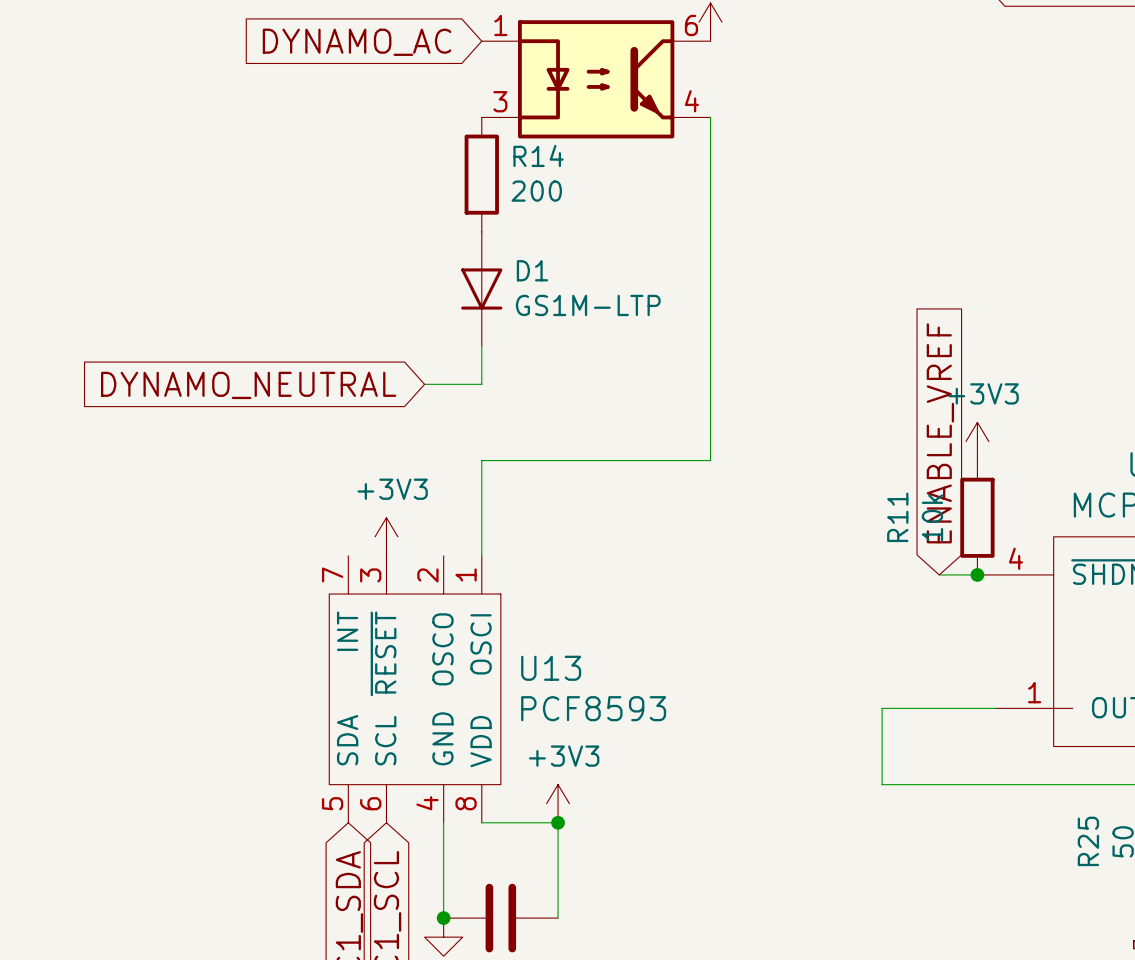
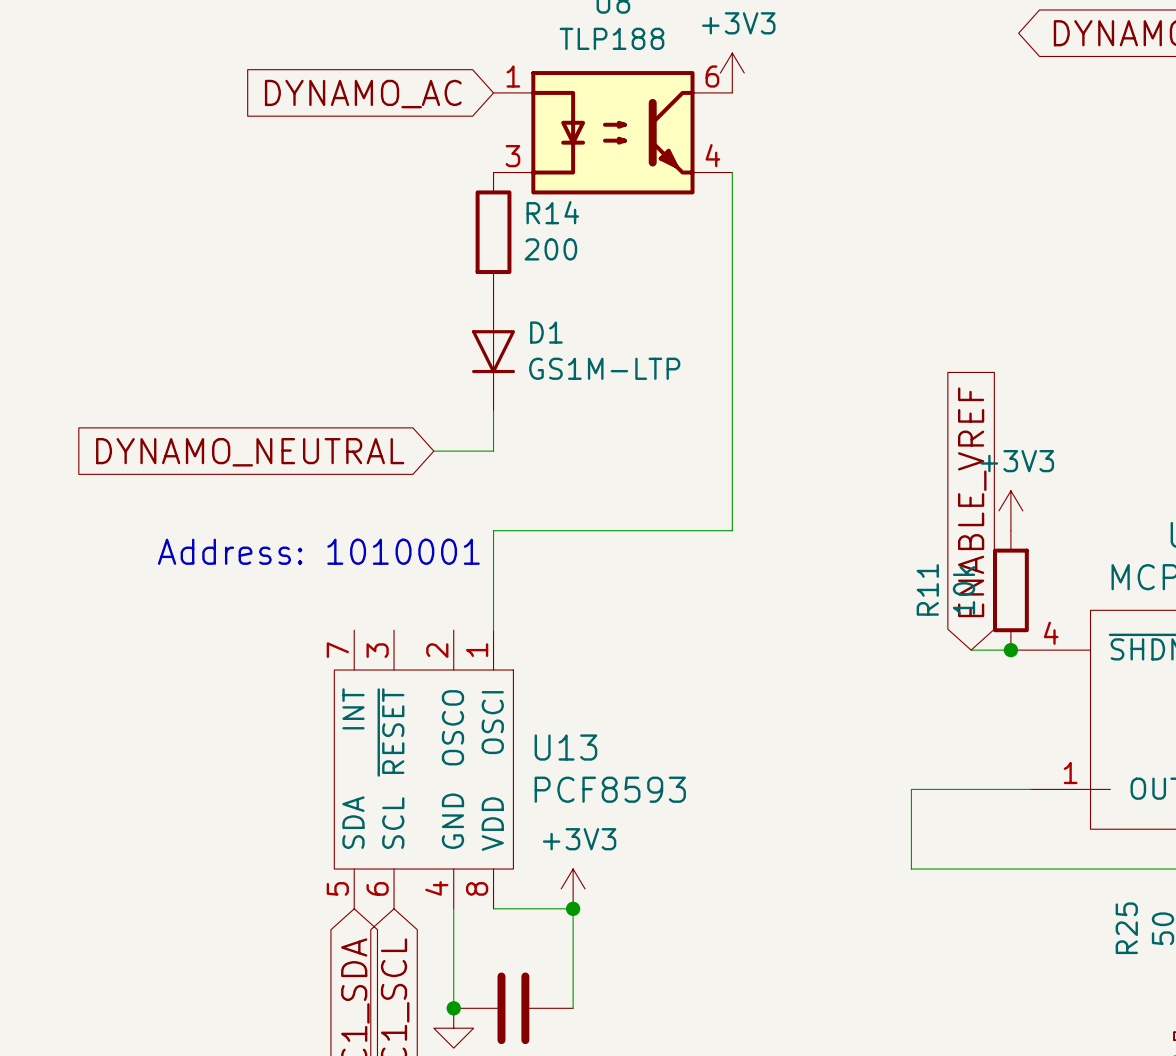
text: none -> Address: 1010001 (318, 551)
power symbol: +3V3 (386, 536) -> none

